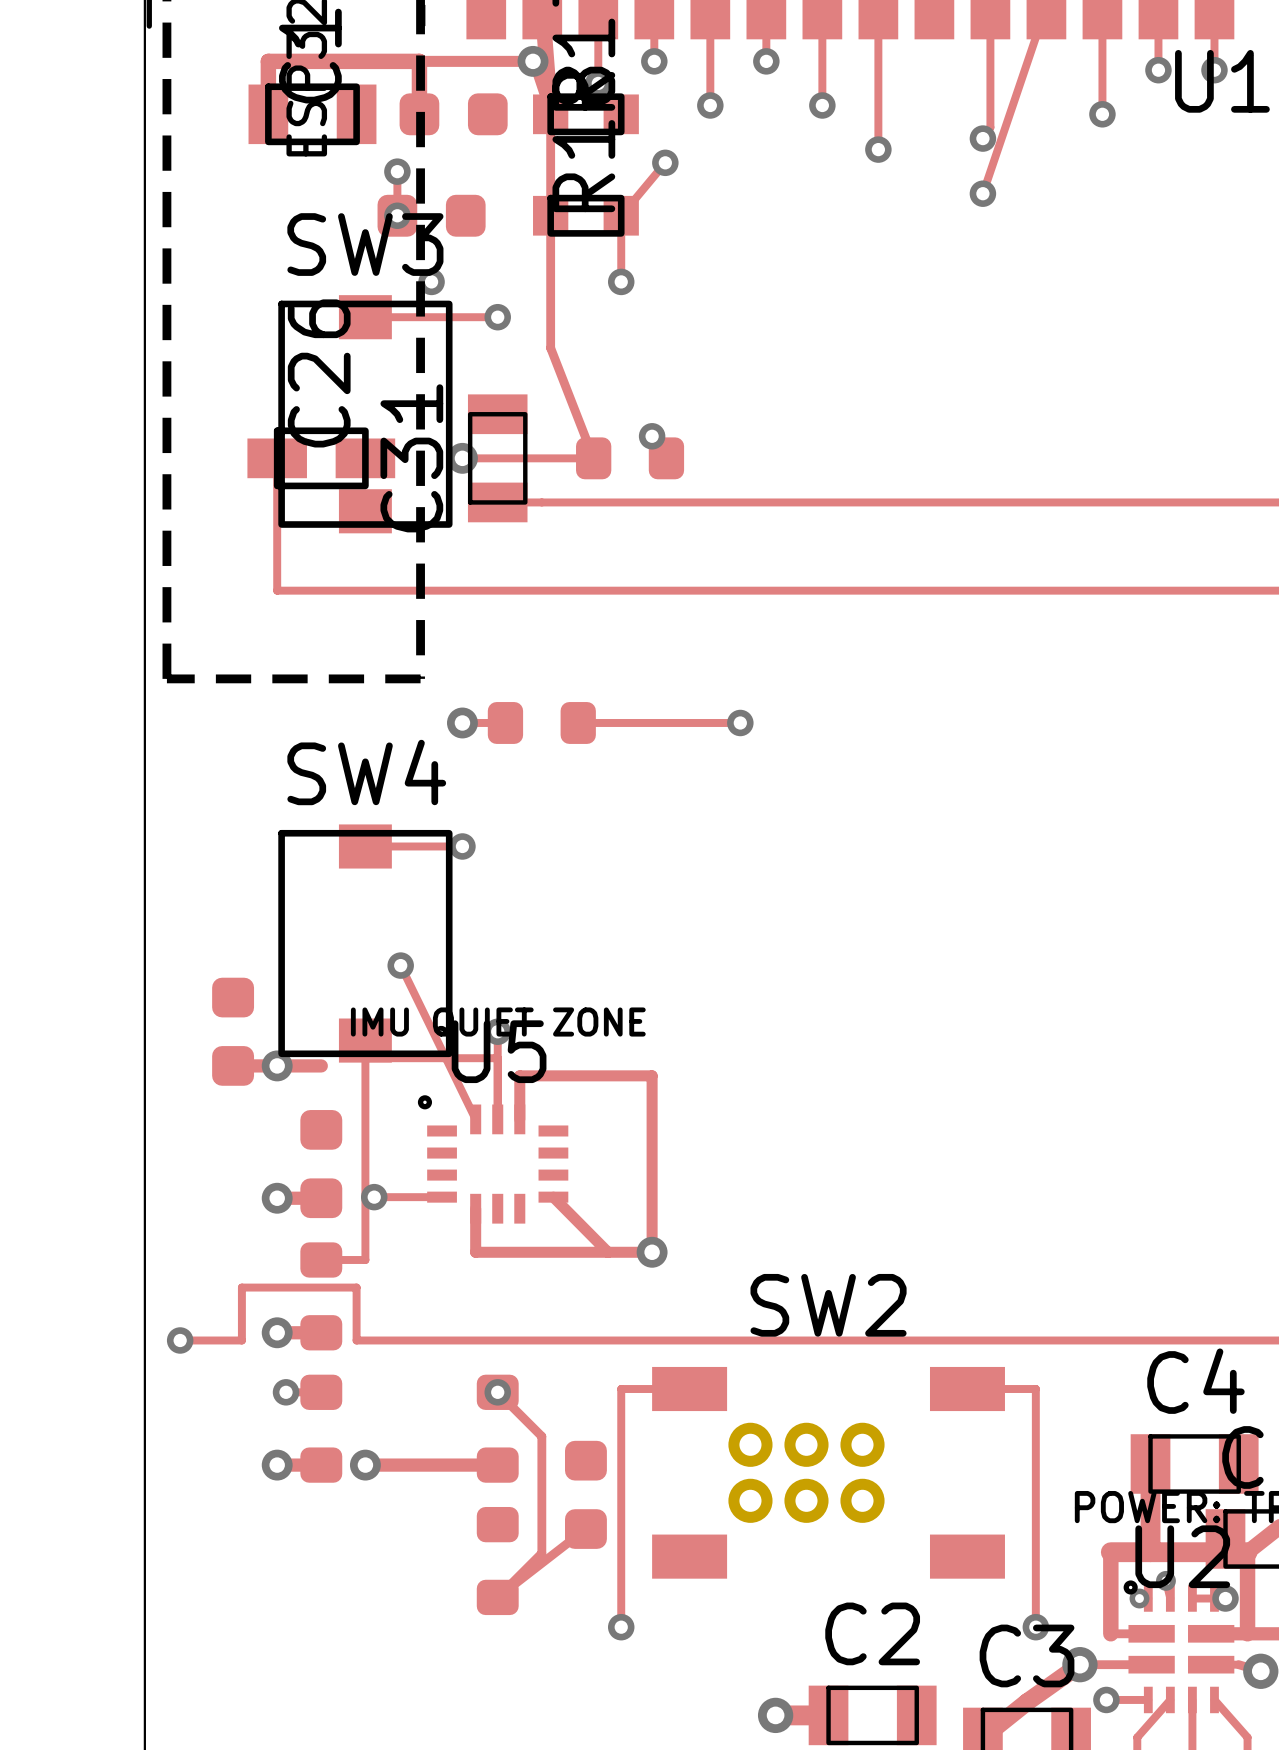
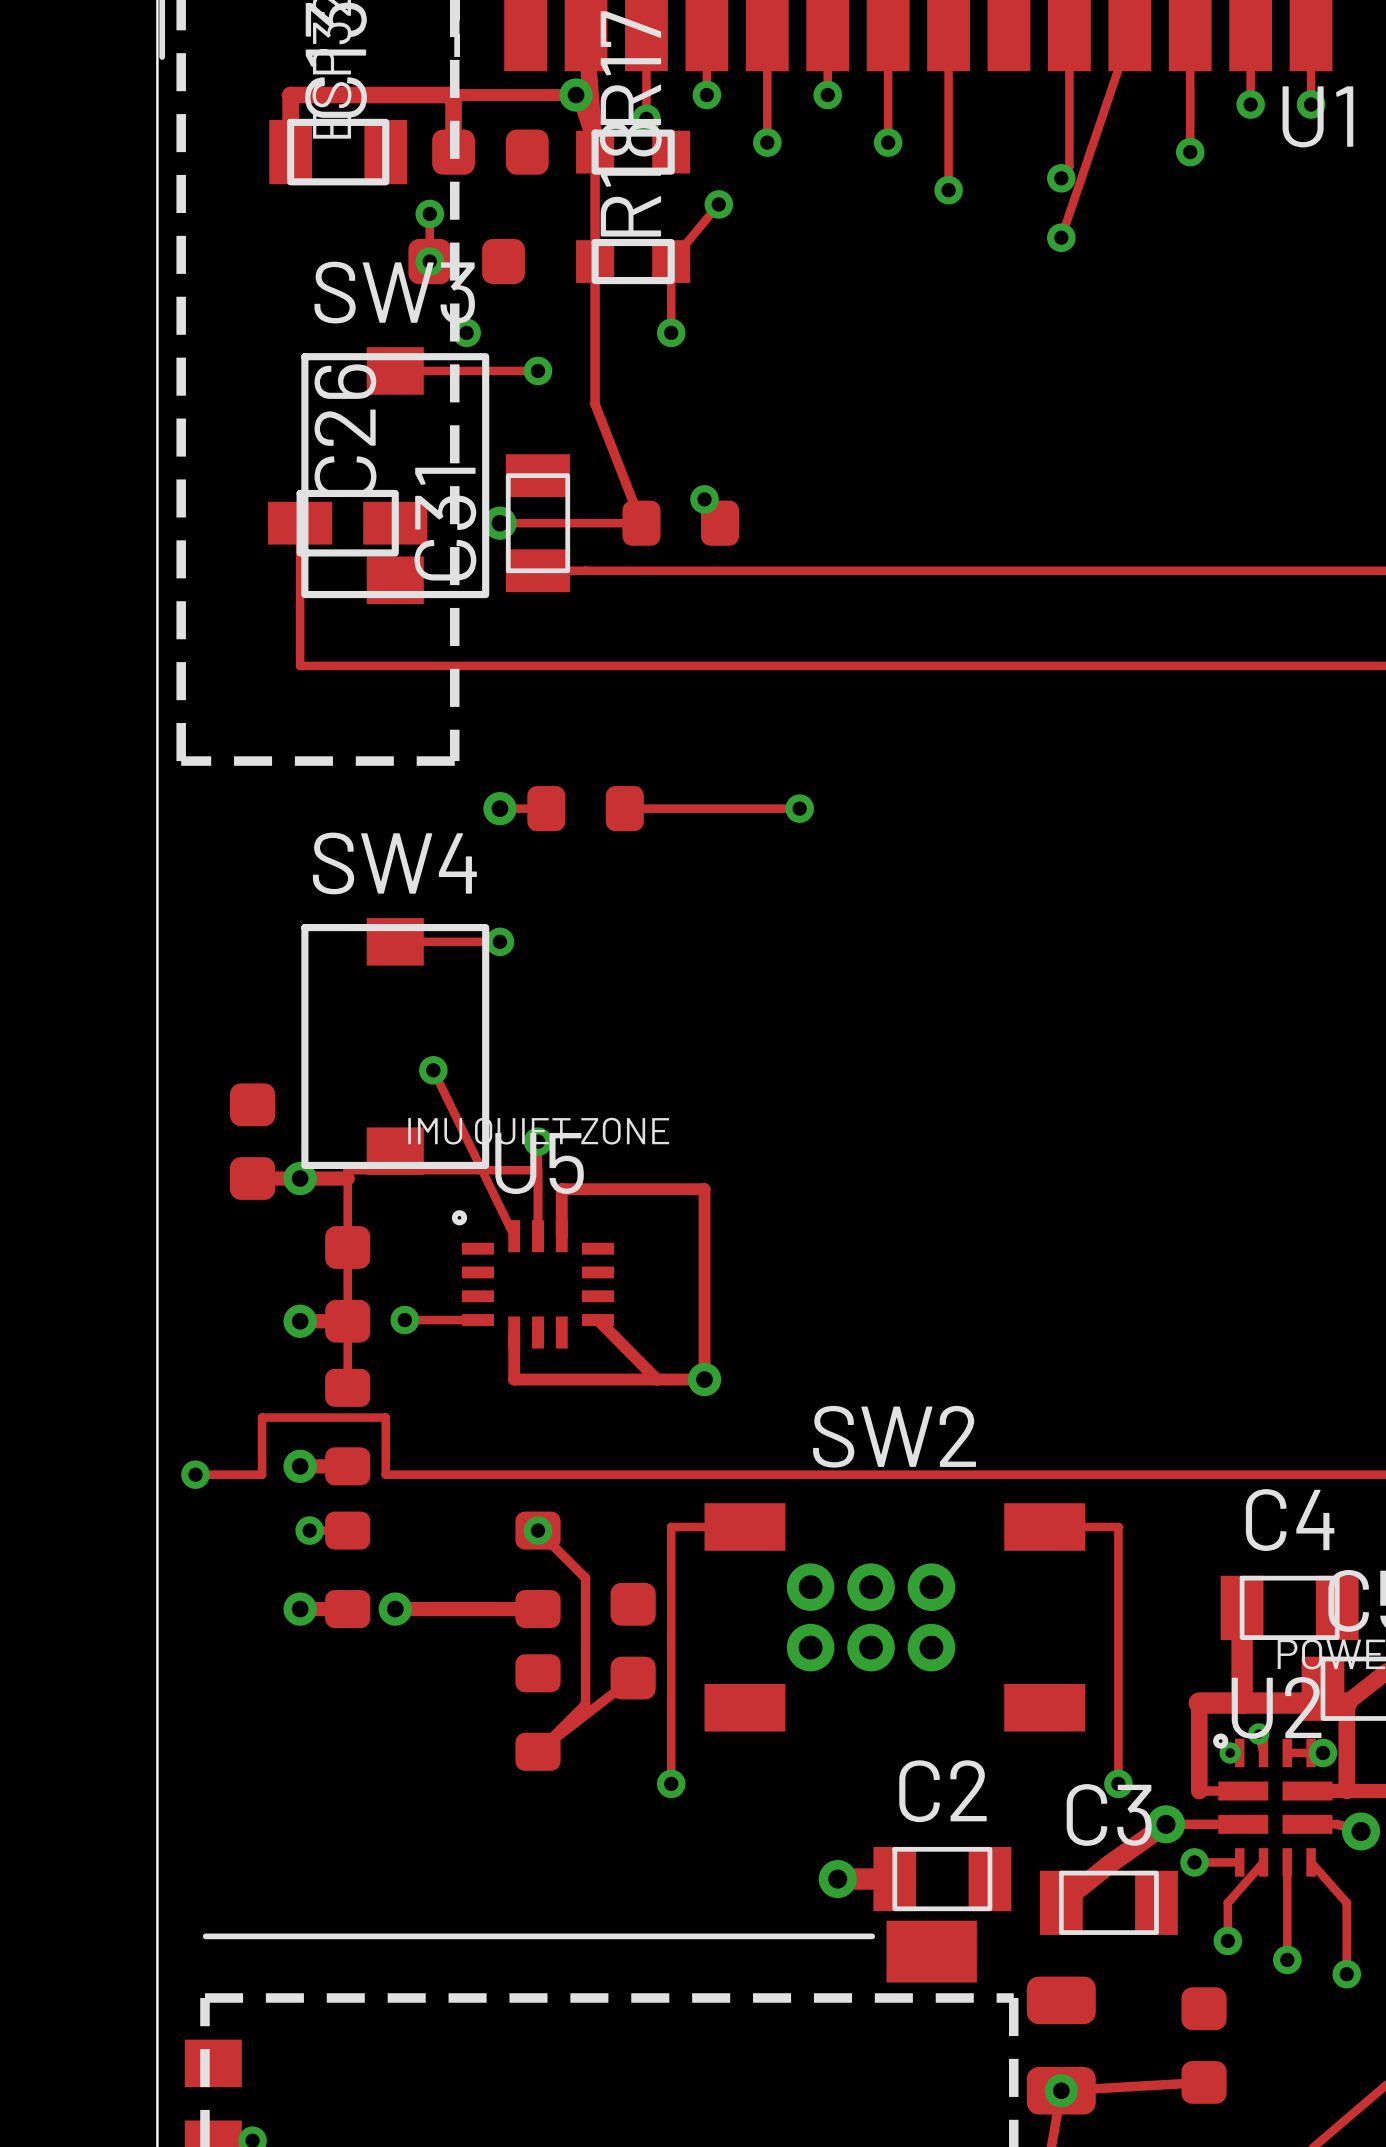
track: (365, 1058) (365, 1259) (321, 1259) -> (395, 1170) (347, 1170) (347, 1387)

